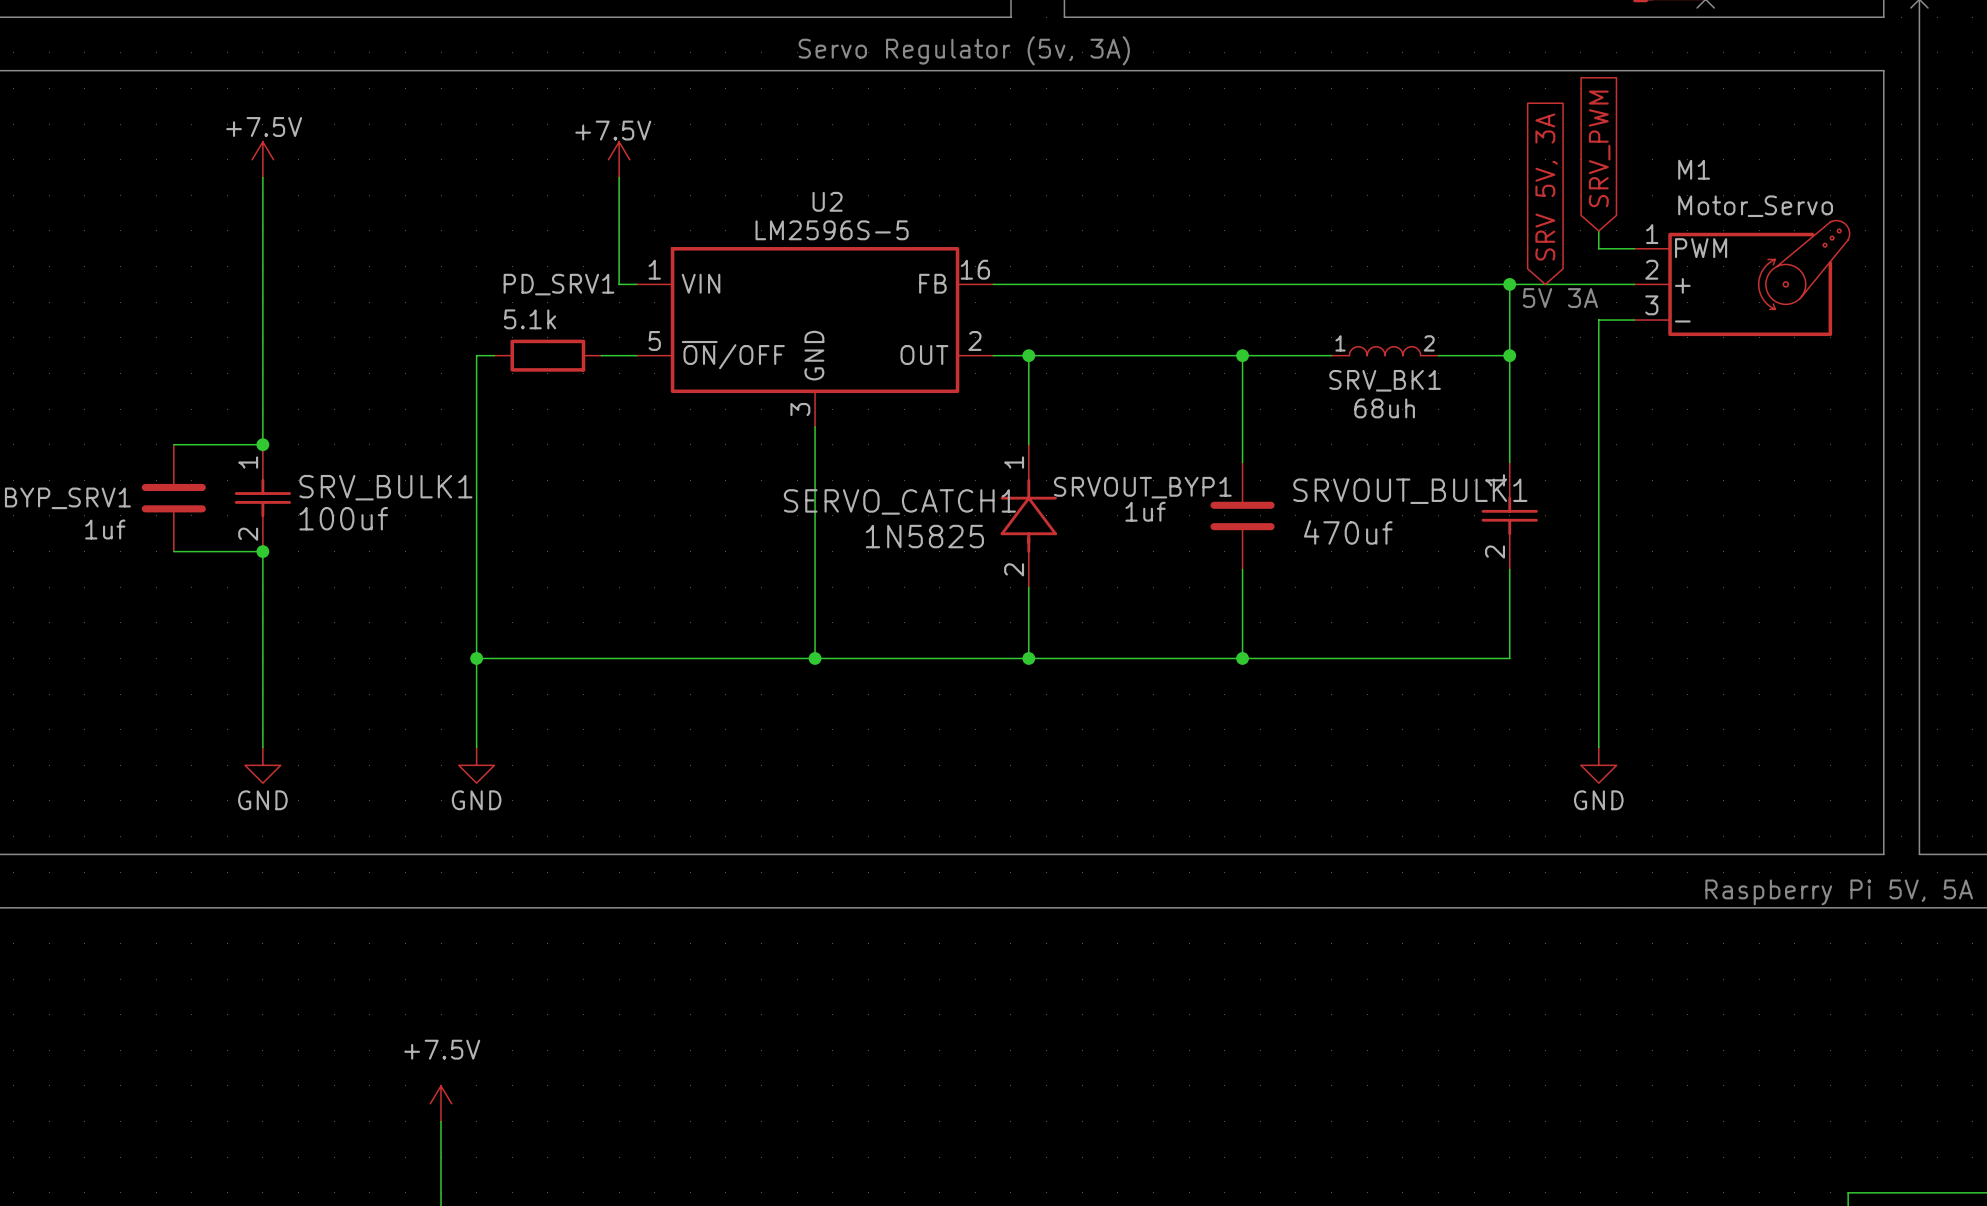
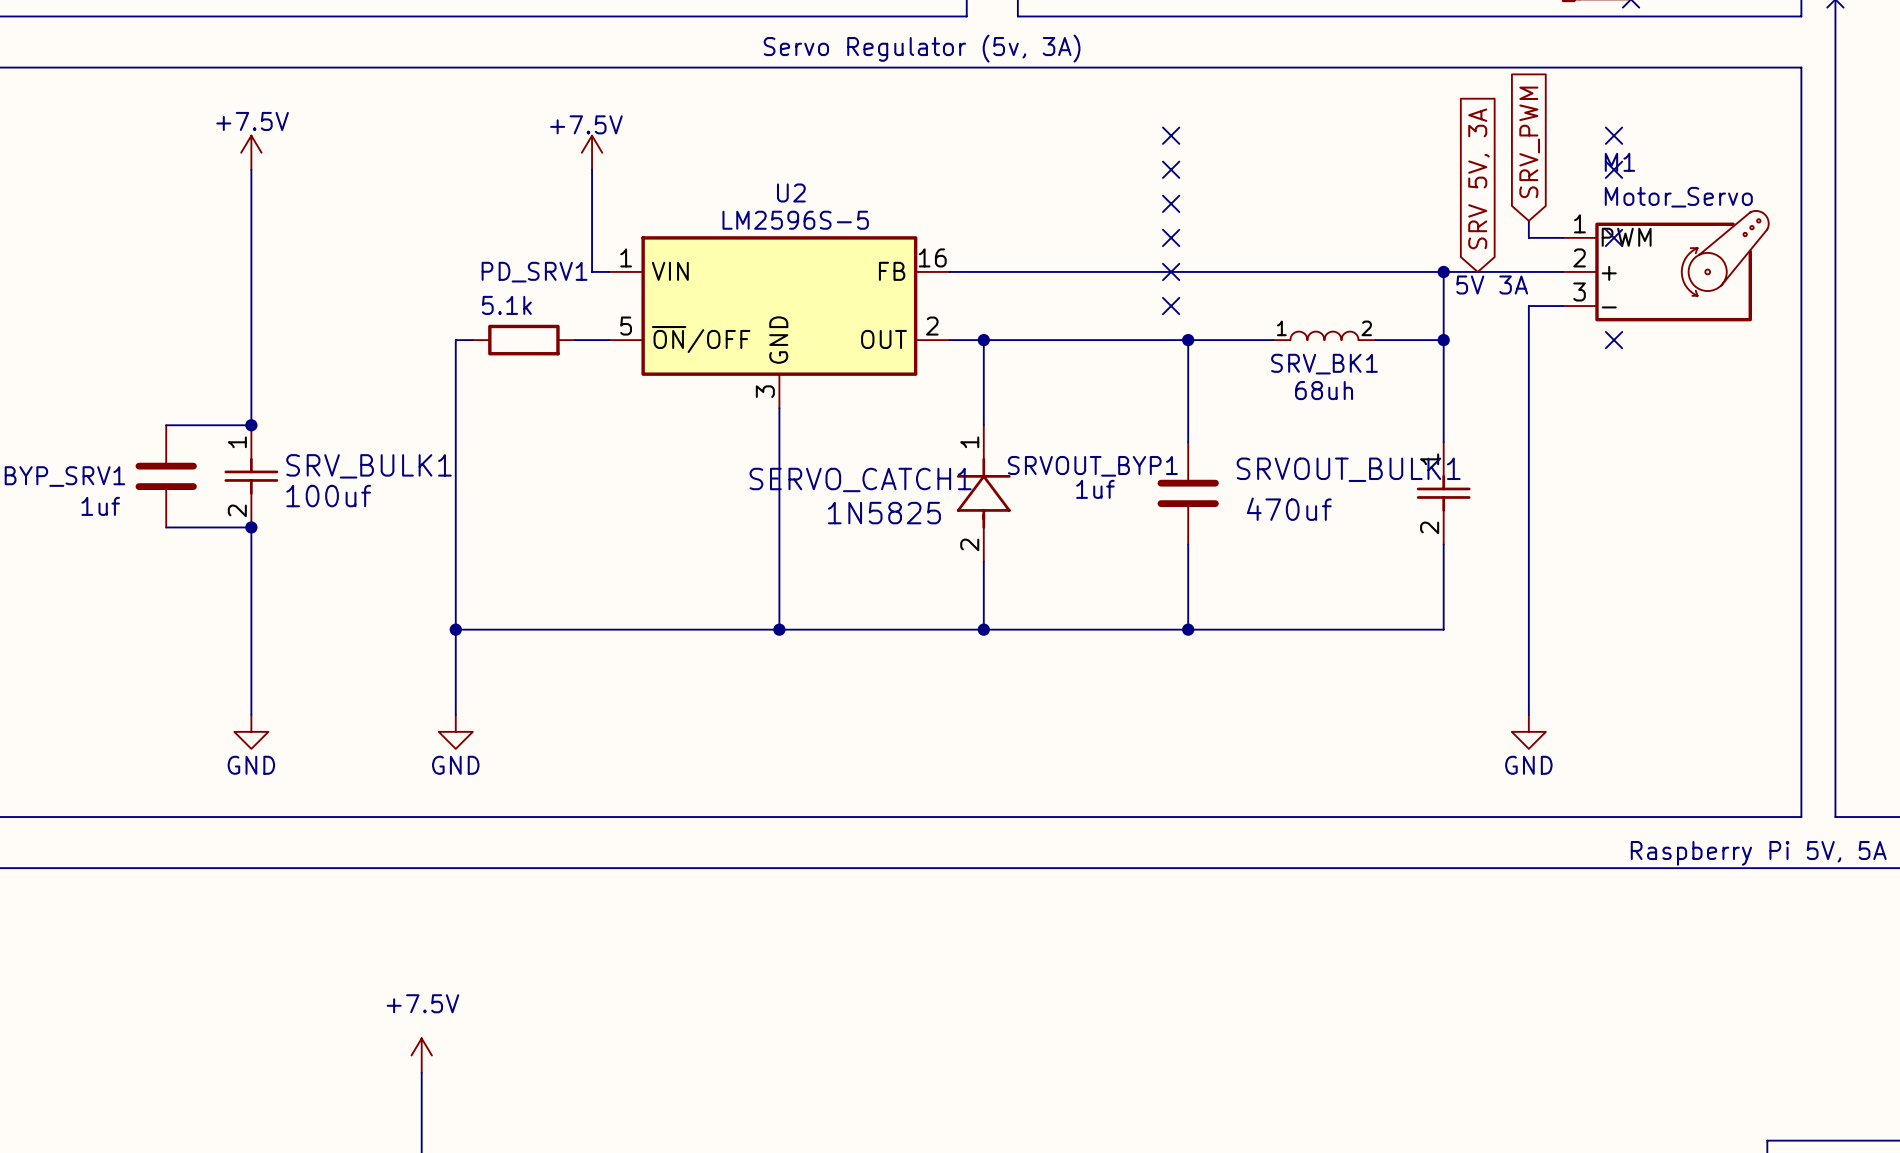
no-connect mark: none -> (1171, 135)
no-connect mark: none -> (1614, 135)
no-connect mark: none -> (1171, 169)
no-connect mark: none -> (1614, 169)
no-connect mark: none -> (1171, 203)
no-connect mark: none -> (1171, 237)
no-connect mark: none -> (1614, 237)
no-connect mark: none -> (1171, 271)
no-connect mark: none -> (1171, 306)
no-connect mark: none -> (1614, 340)

